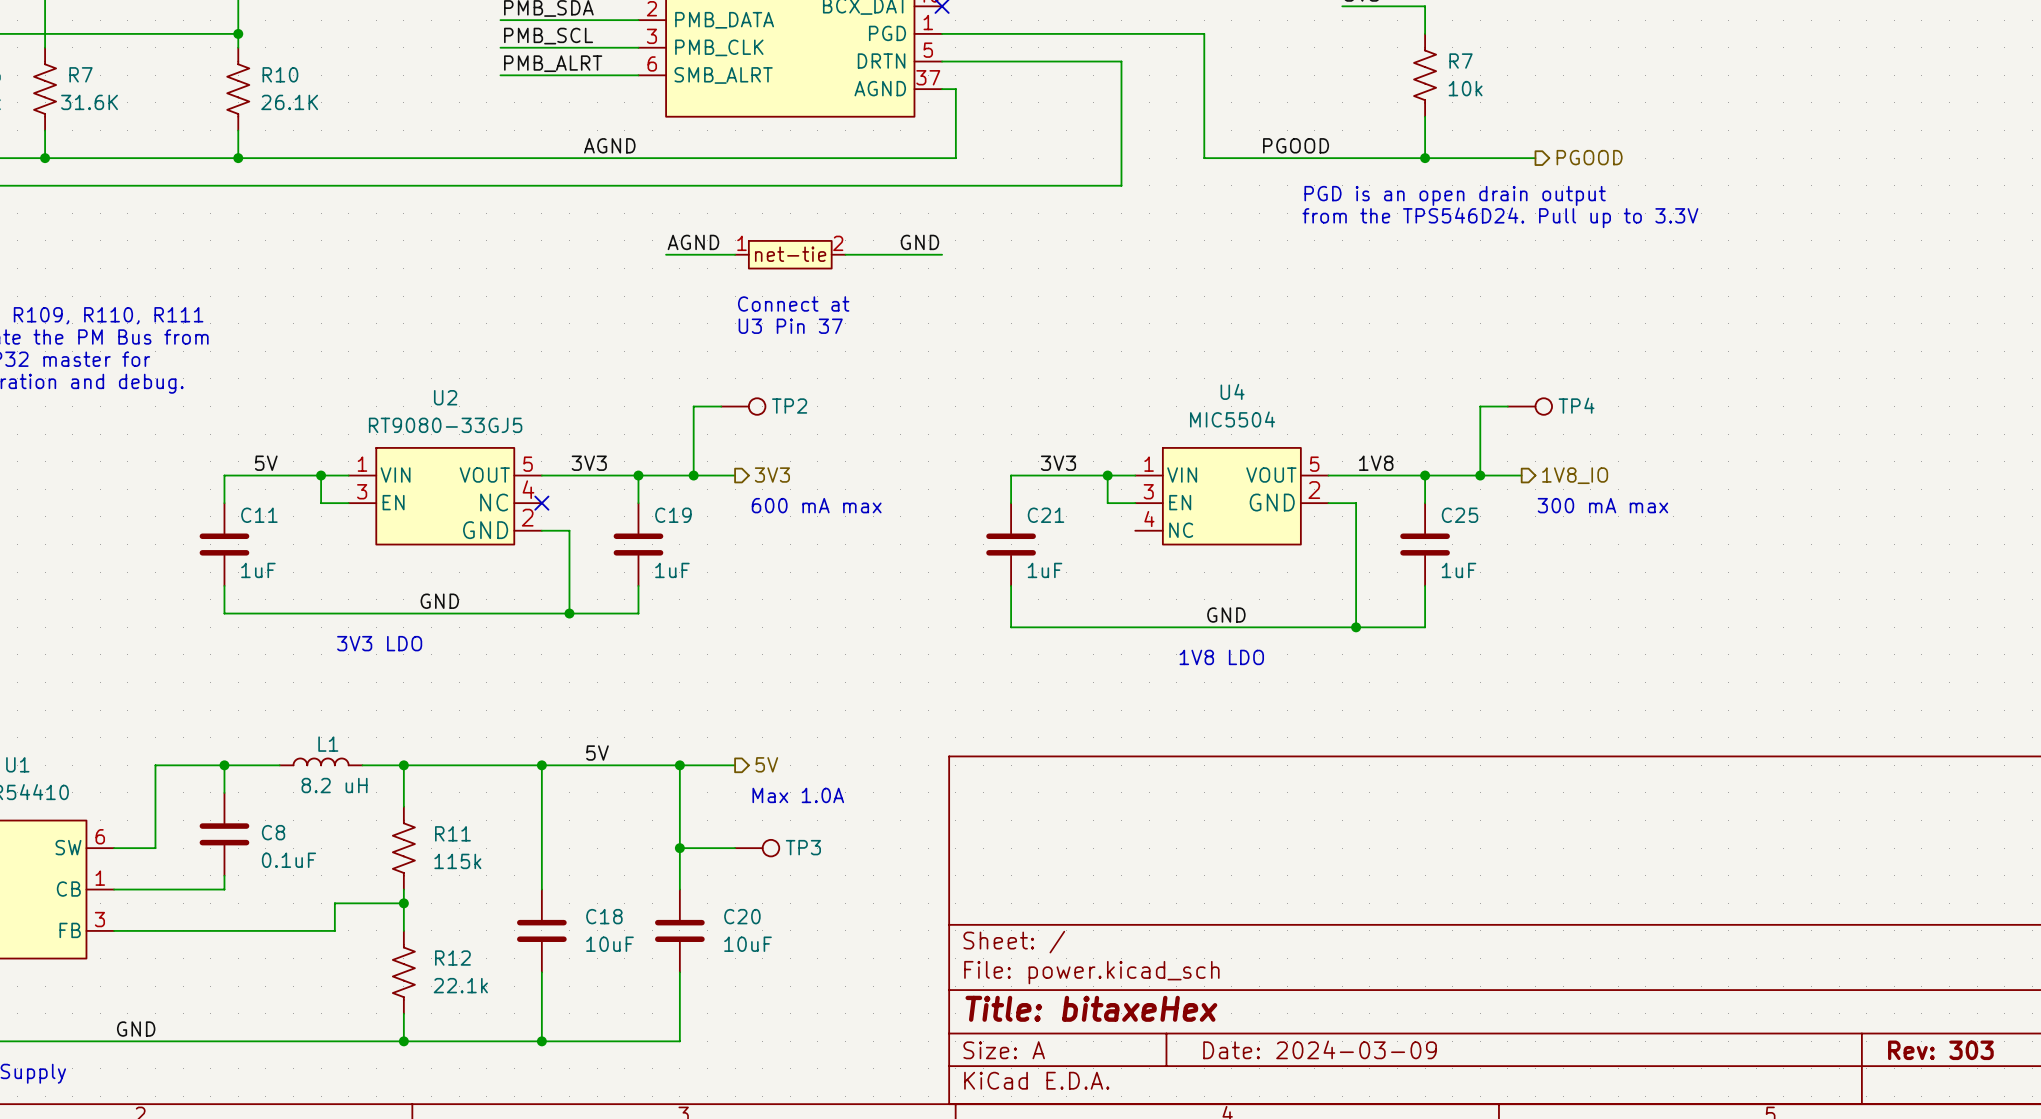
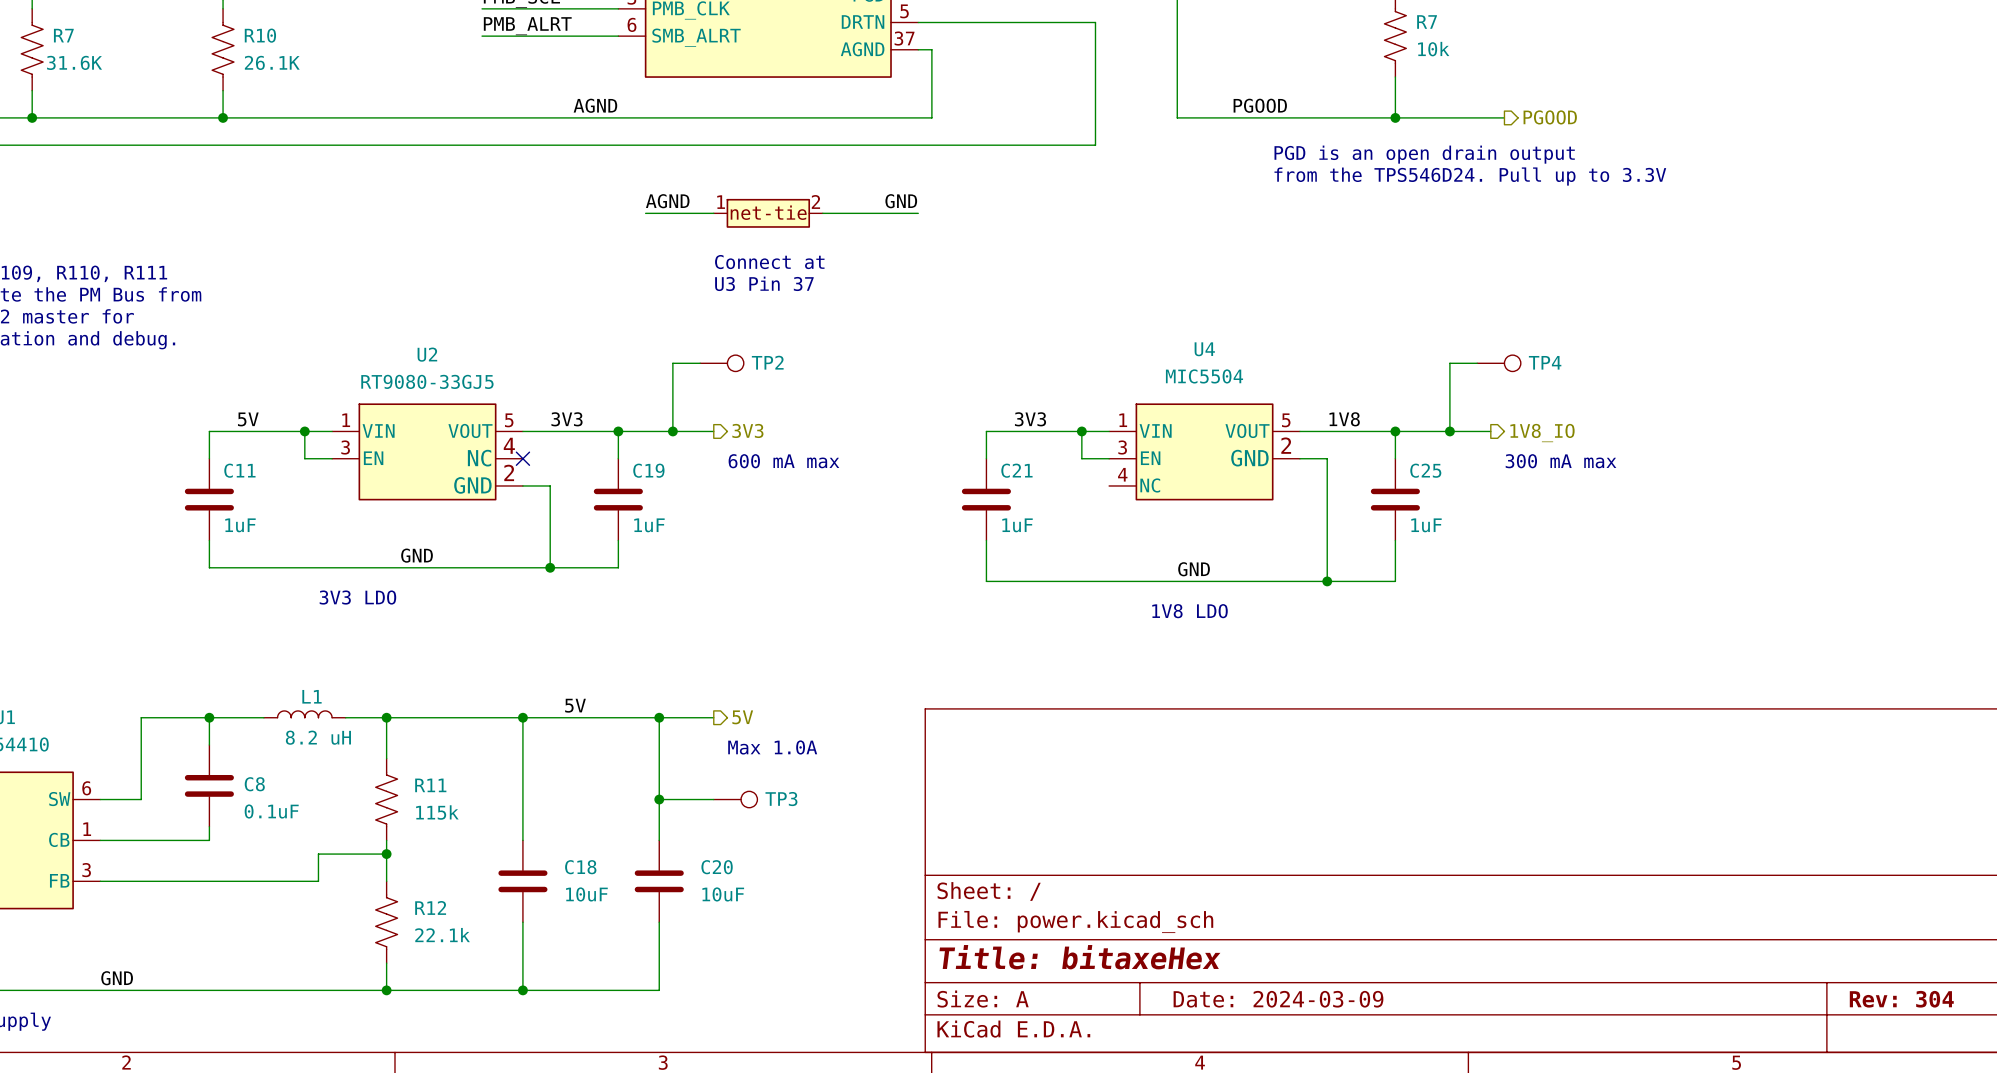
title block: Rev: 303 (1940, 1050) -> Rev: 304 (1901, 999)

